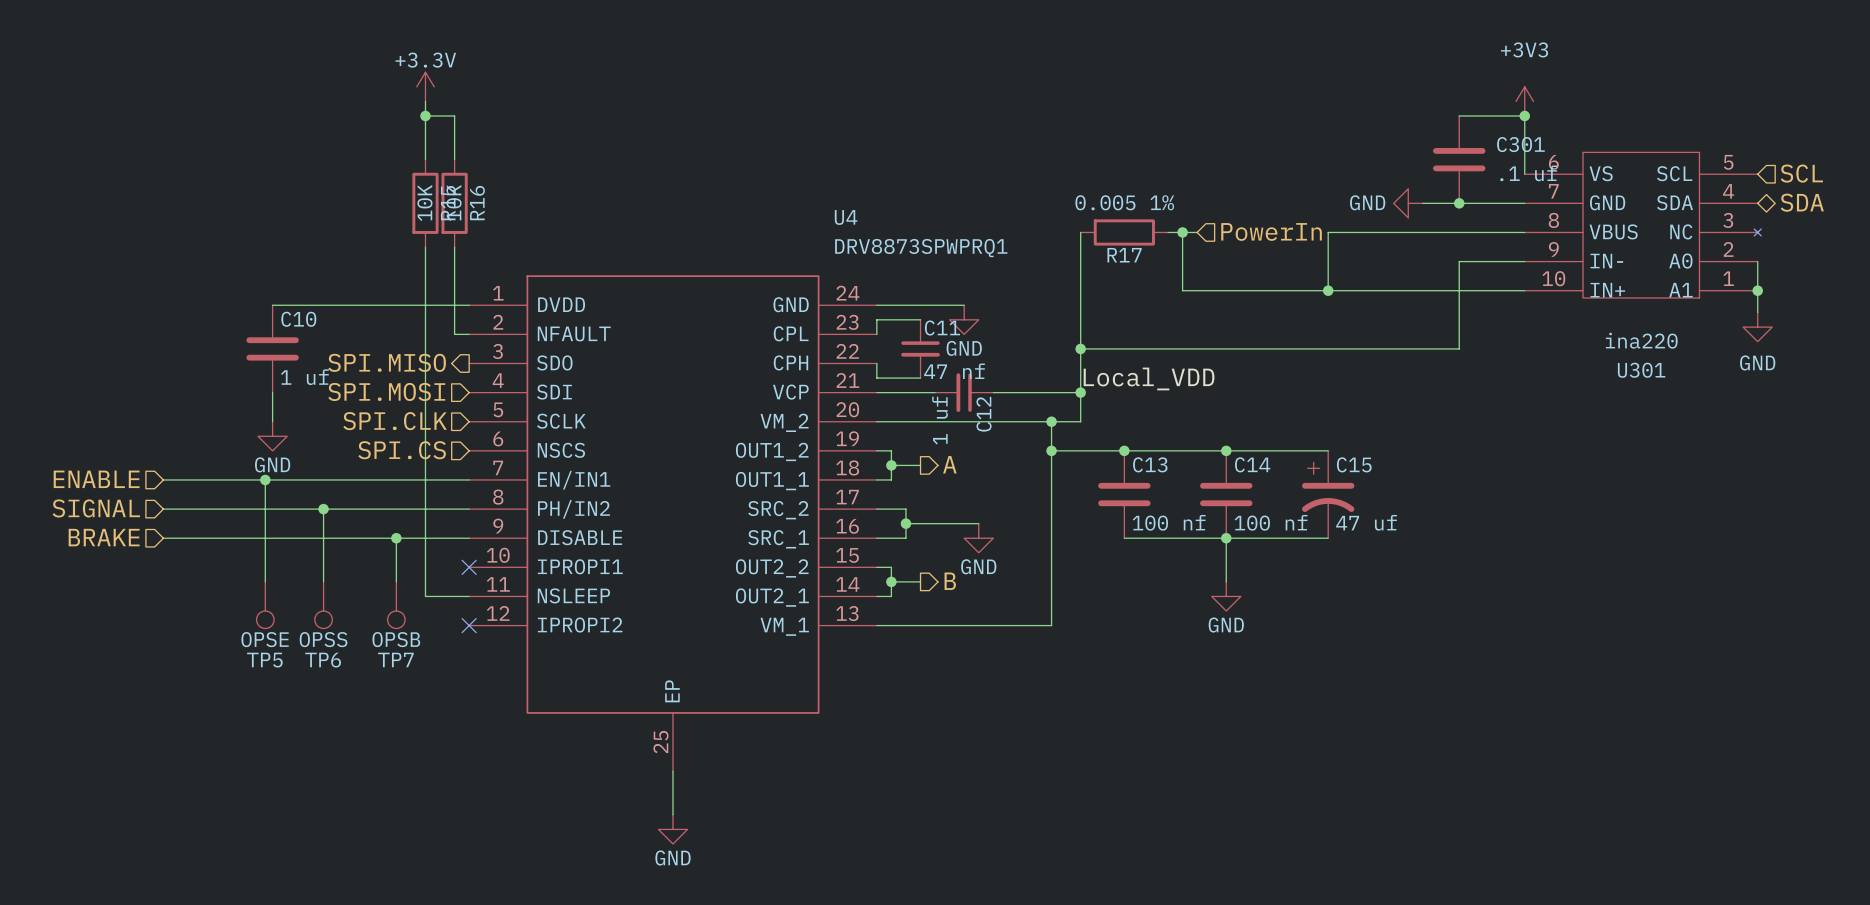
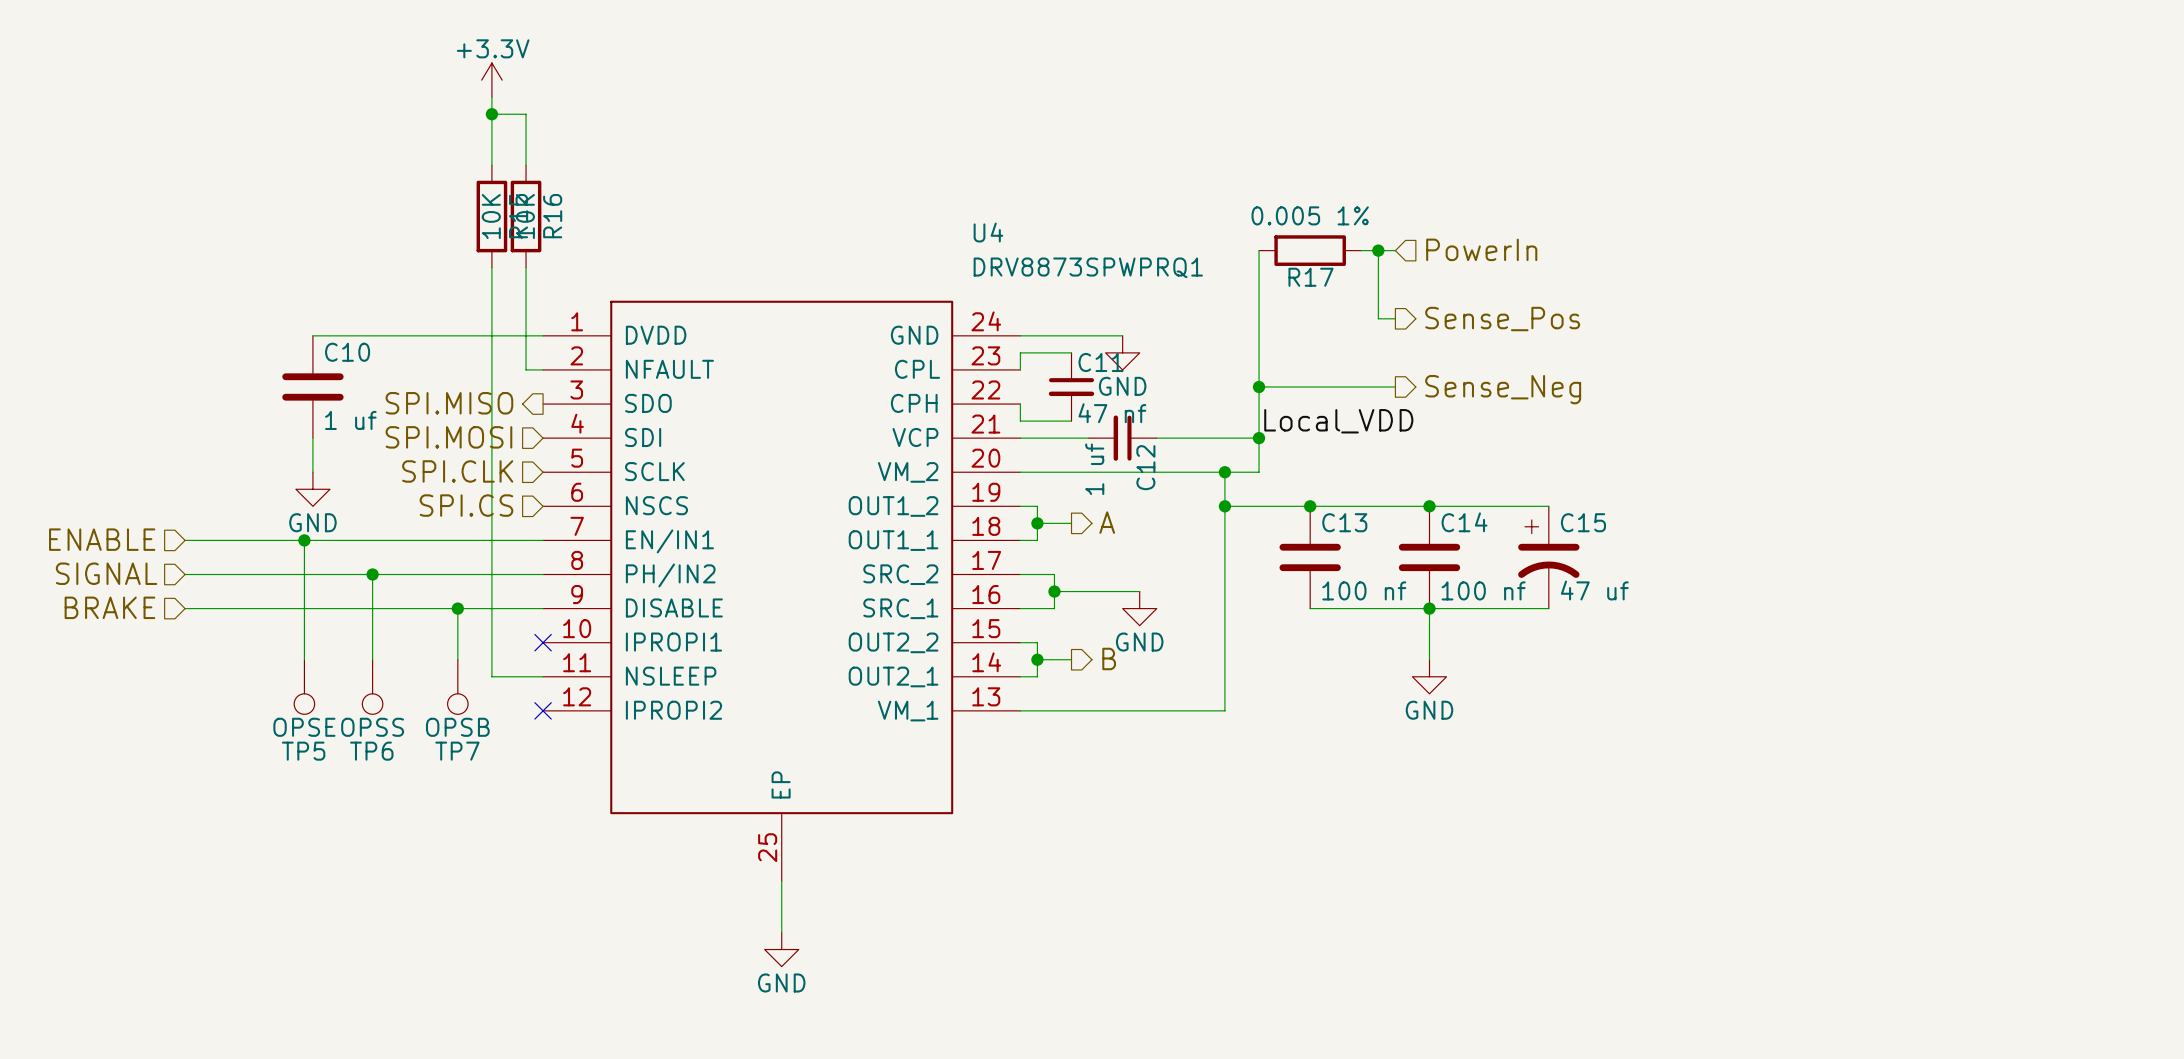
power symbol: +3V3 (1524, 101) -> none
wire: (1459, 115) (1524, 115) (1524, 174) -> none
junction: (1524, 115) -> none
C301: .1 uf (1459, 159) -> none
hierarchical label: SCL (1801, 173) -> none
hierarchical label: SDA (1802, 202) -> none
power symbol: GND (1408, 203) -> none
wire: (1422, 203) (1524, 203) -> none
junction: (1459, 203) -> none
U301: ina220 (1642, 225) -> none
wire: (1524, 232) (1328, 232) (1328, 290) -> none
wire: (1524, 261) (1459, 261) (1459, 348) (1197, 348) -> none
wire: (1757, 261) (1757, 312) -> none
wire: (1197, 290) (1524, 290) -> none
junction: (1328, 290) -> none
junction: (1757, 290) -> none
hierarchical label: none -> Sense_Pos (1502, 319)
power symbol: GND (1757, 327) -> none
hierarchical label: none -> Sense_Neg (1503, 389)

